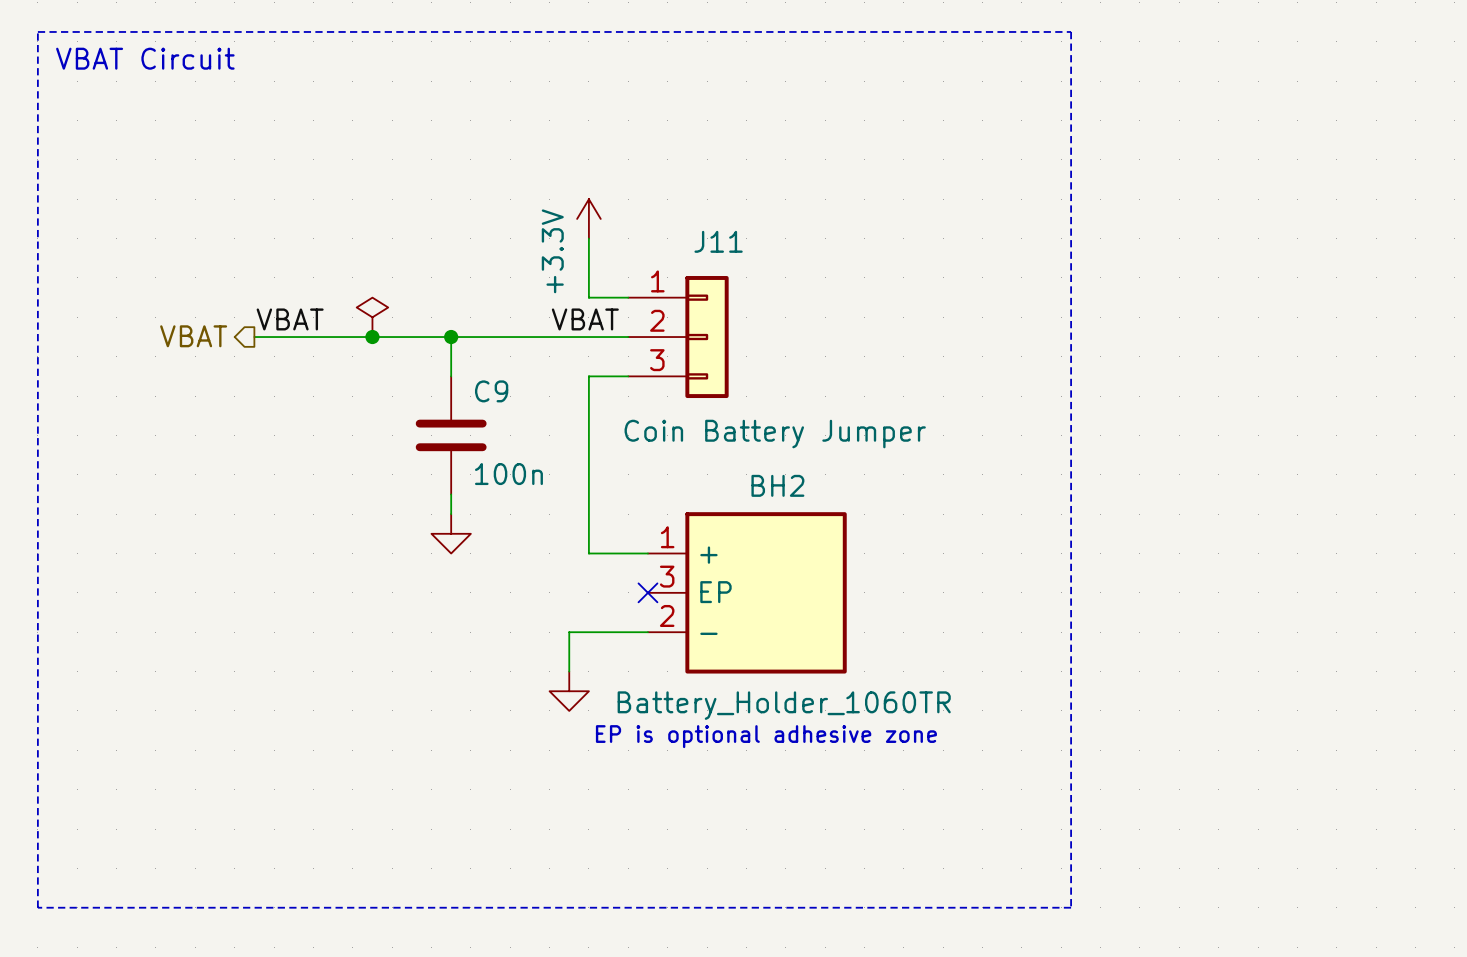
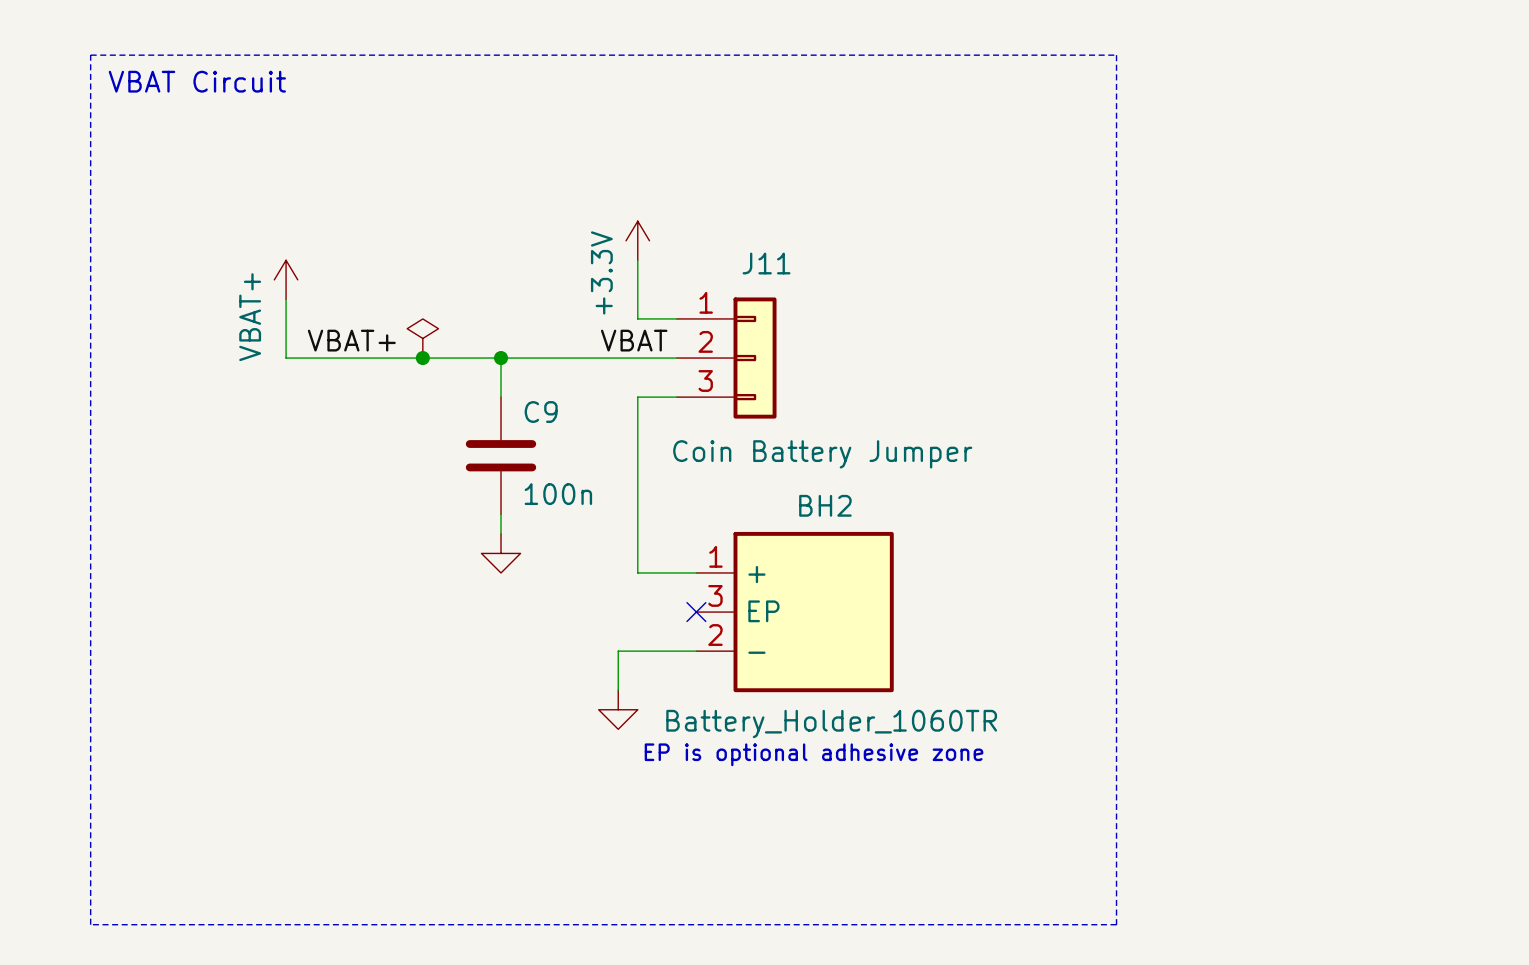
power symbol: none -> VBAT+ (286, 279)
wire: none -> (286, 299) (286, 358) (305, 358)
label: VBAT (290, 319) -> VBAT+ (351, 340)
hierarchical label: VBAT (193, 336) -> none

